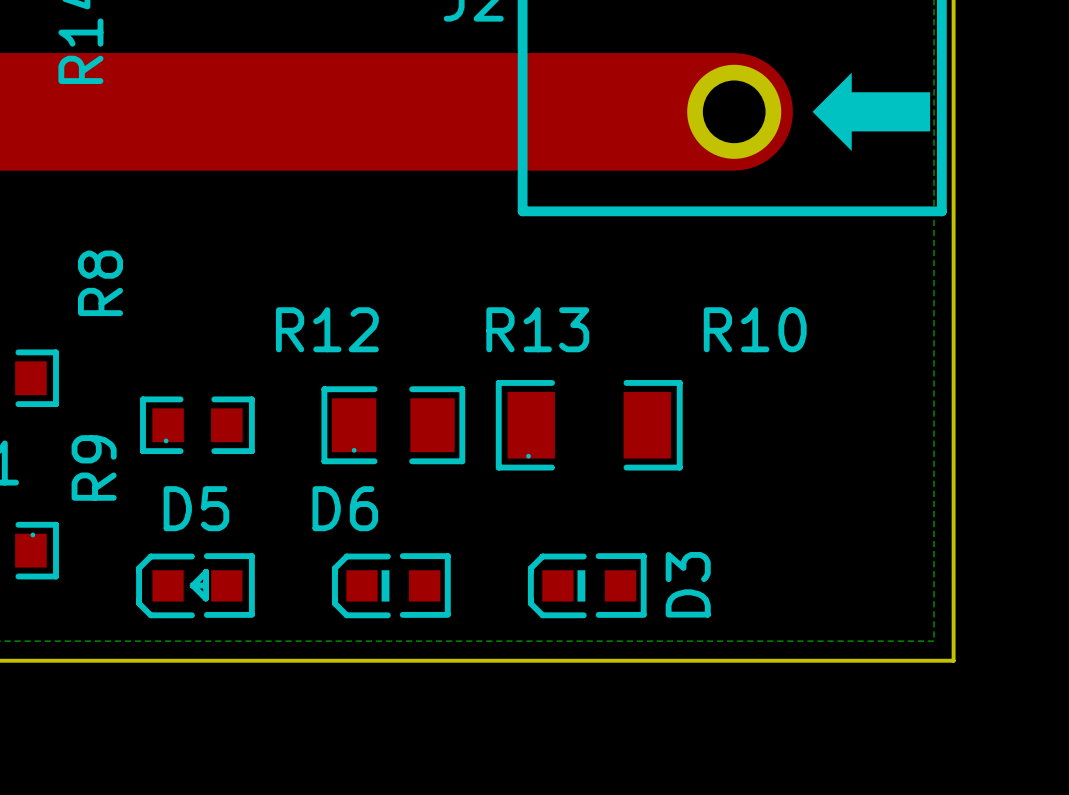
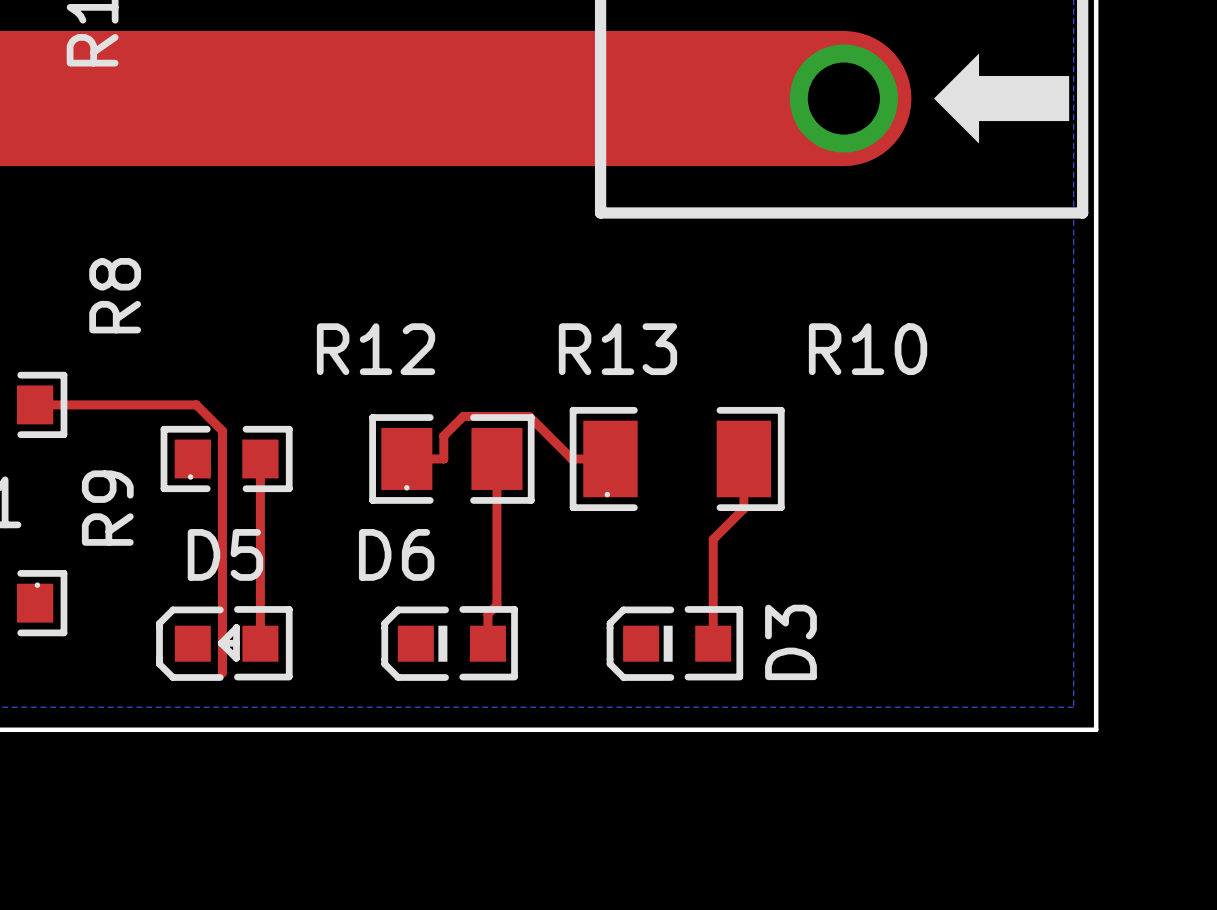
top track: none -> (35, 404) (196, 404) (222, 430) (222, 673)
top track: none -> (260, 458) (260, 643)
top track: none -> (406, 458) (443, 458) (443, 435) (463, 416) (529, 416) (571, 458) (610, 458)
top track: none -> (496, 458) (496, 605) (487, 614) (487, 643)
top track: none -> (743, 458) (743, 508) (713, 539) (713, 643)

